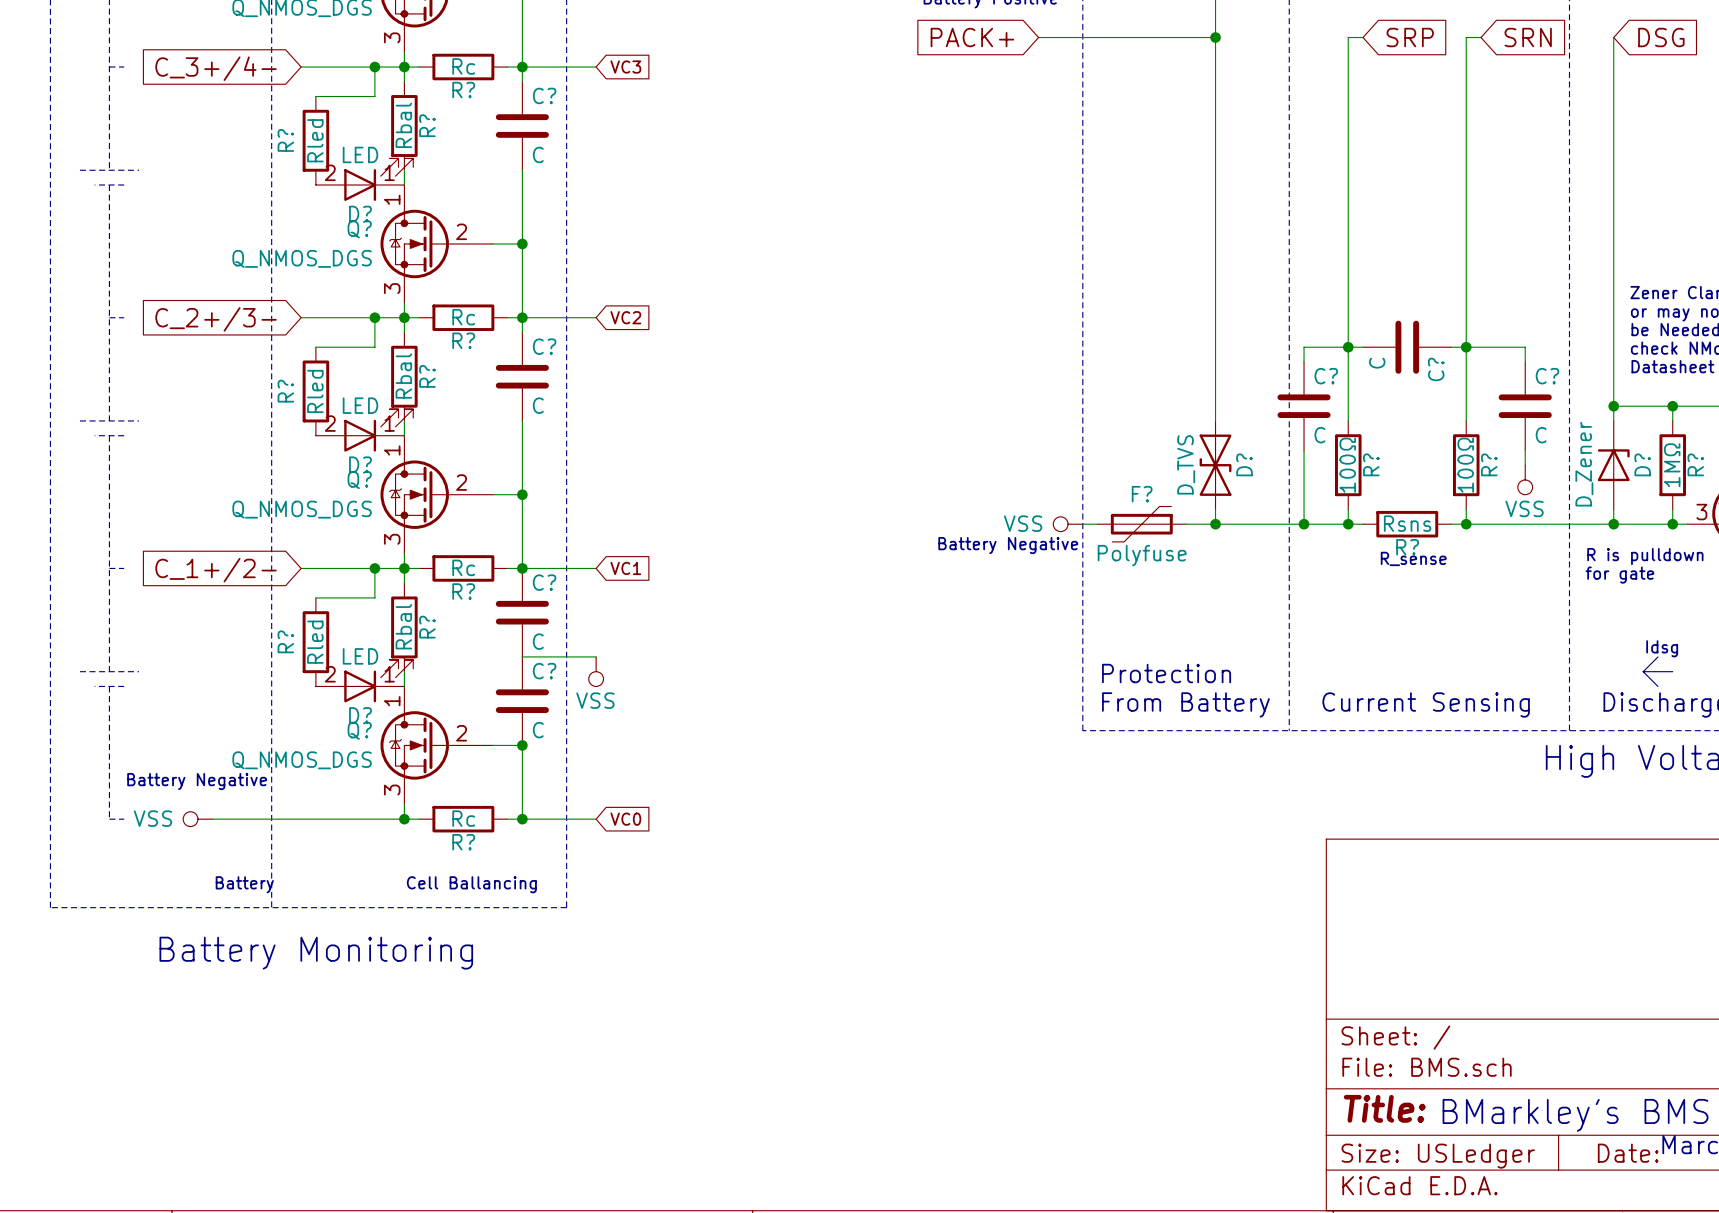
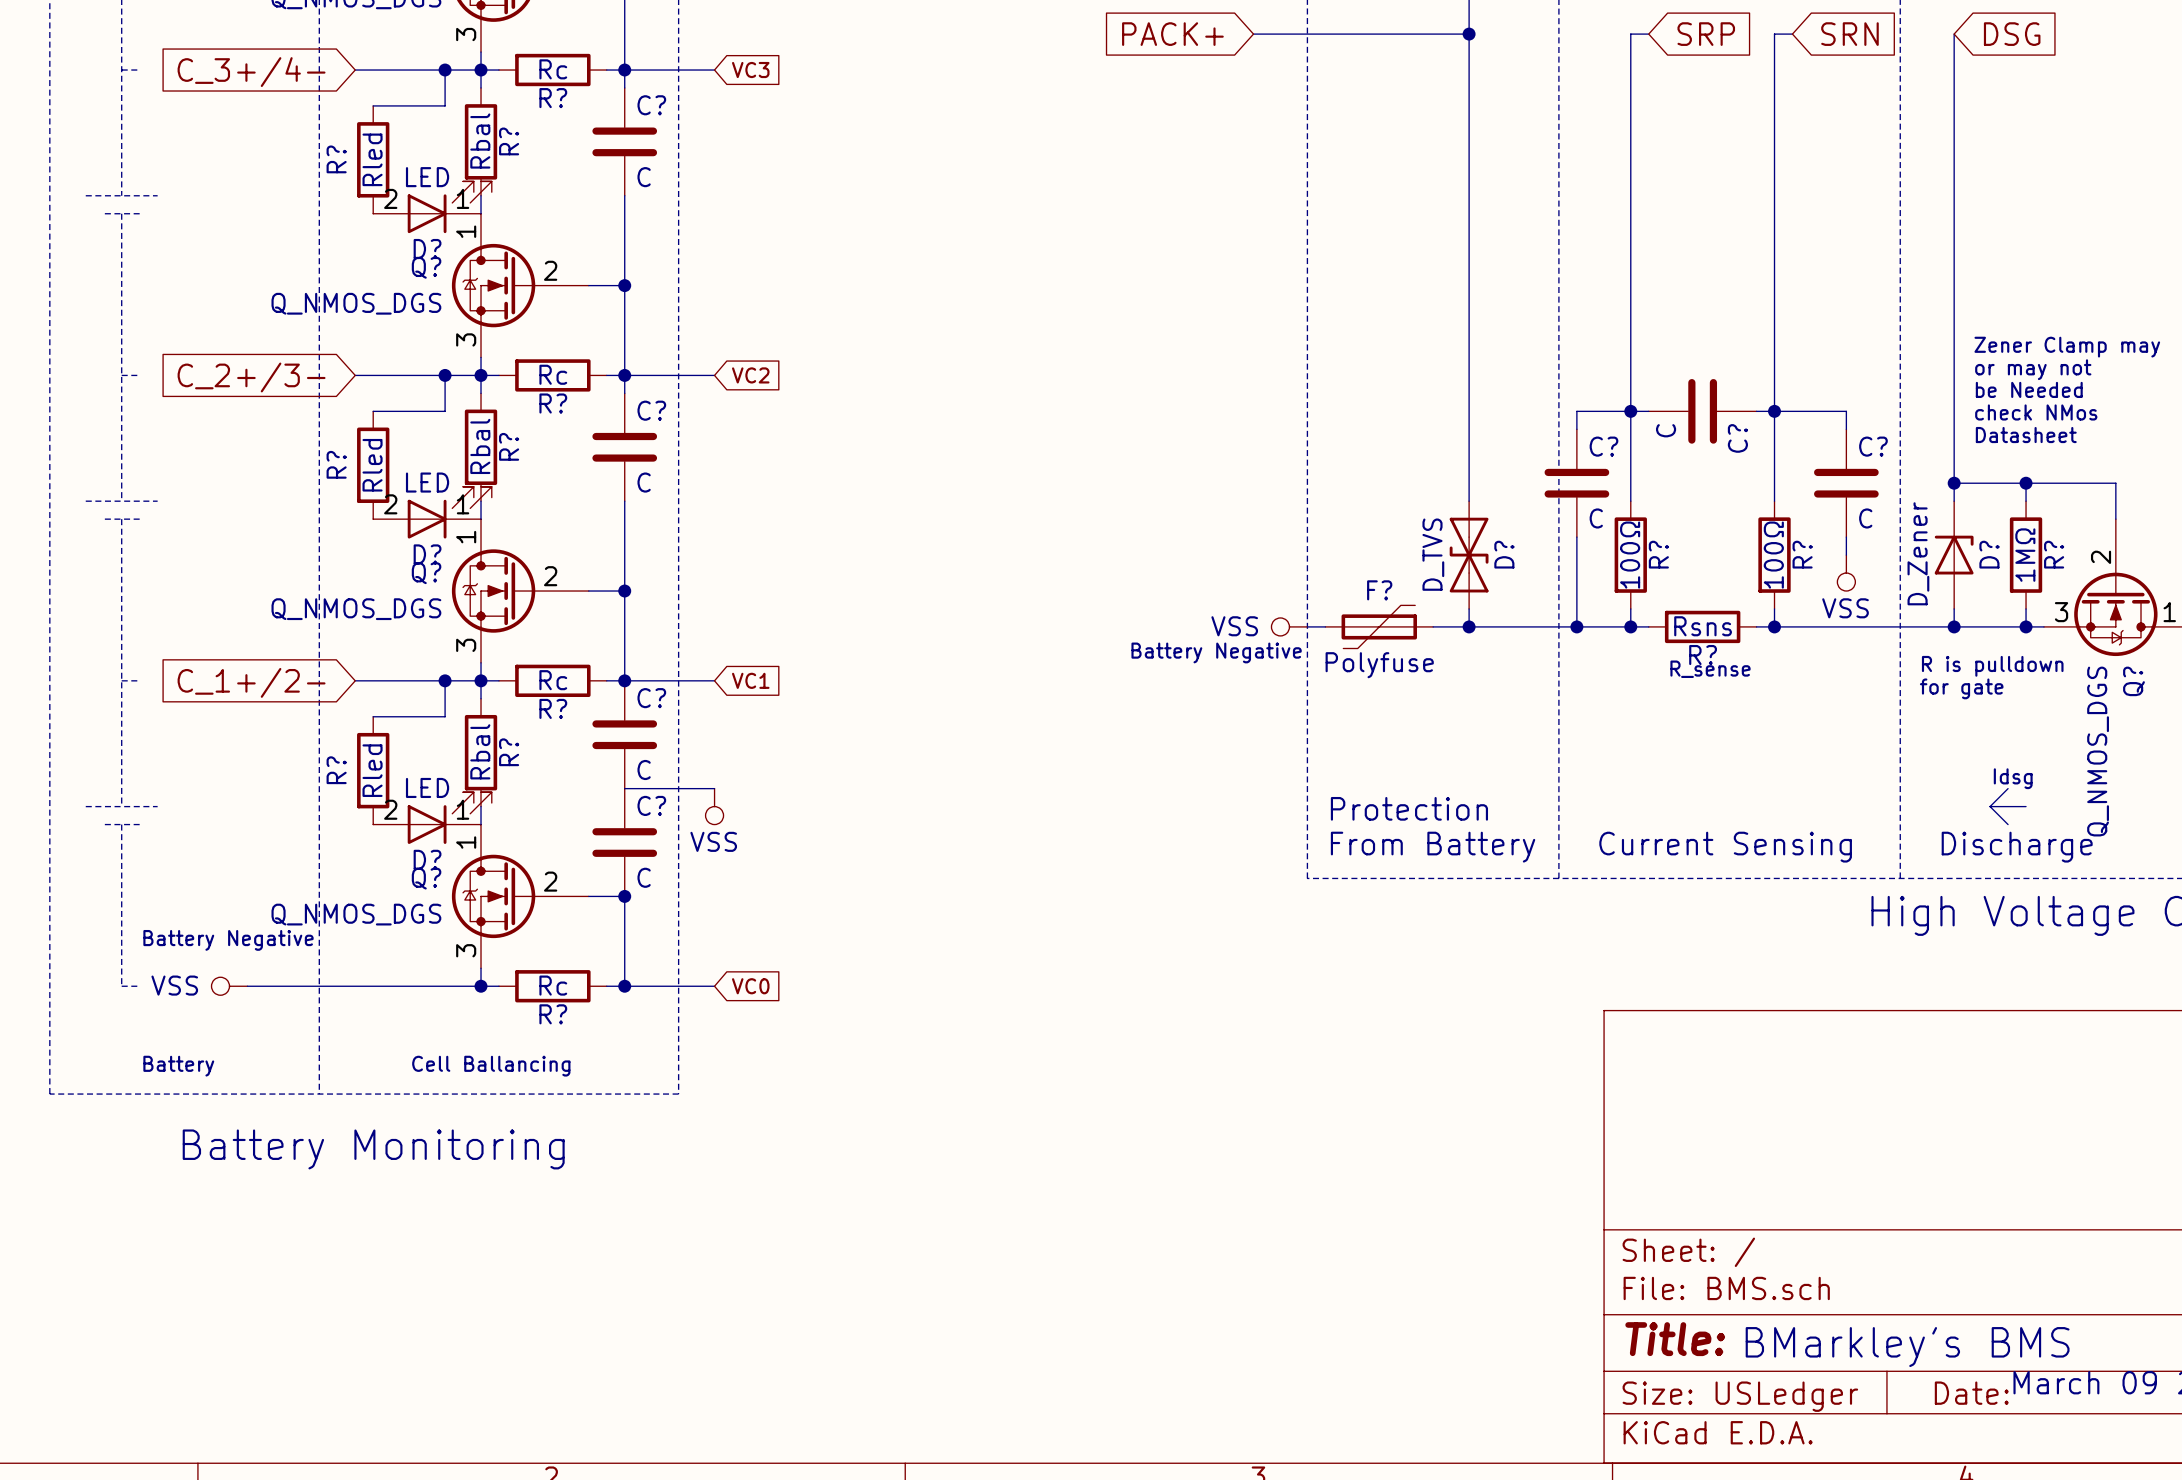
text position: Battery (244, 884) -> Battery (178, 1066)
text position: Cell Ballancing (471, 884) -> Cell Ballancing (491, 1066)

